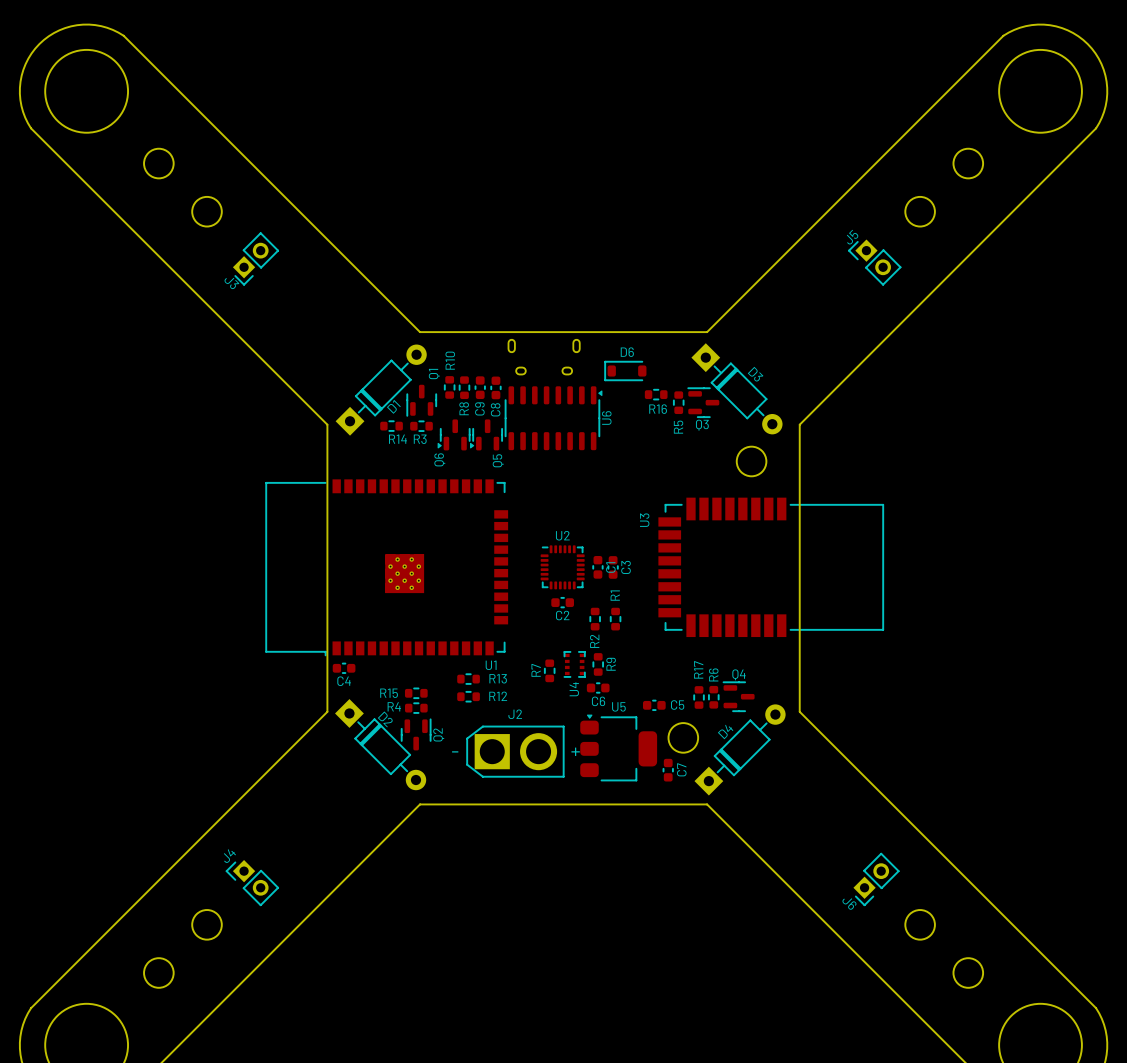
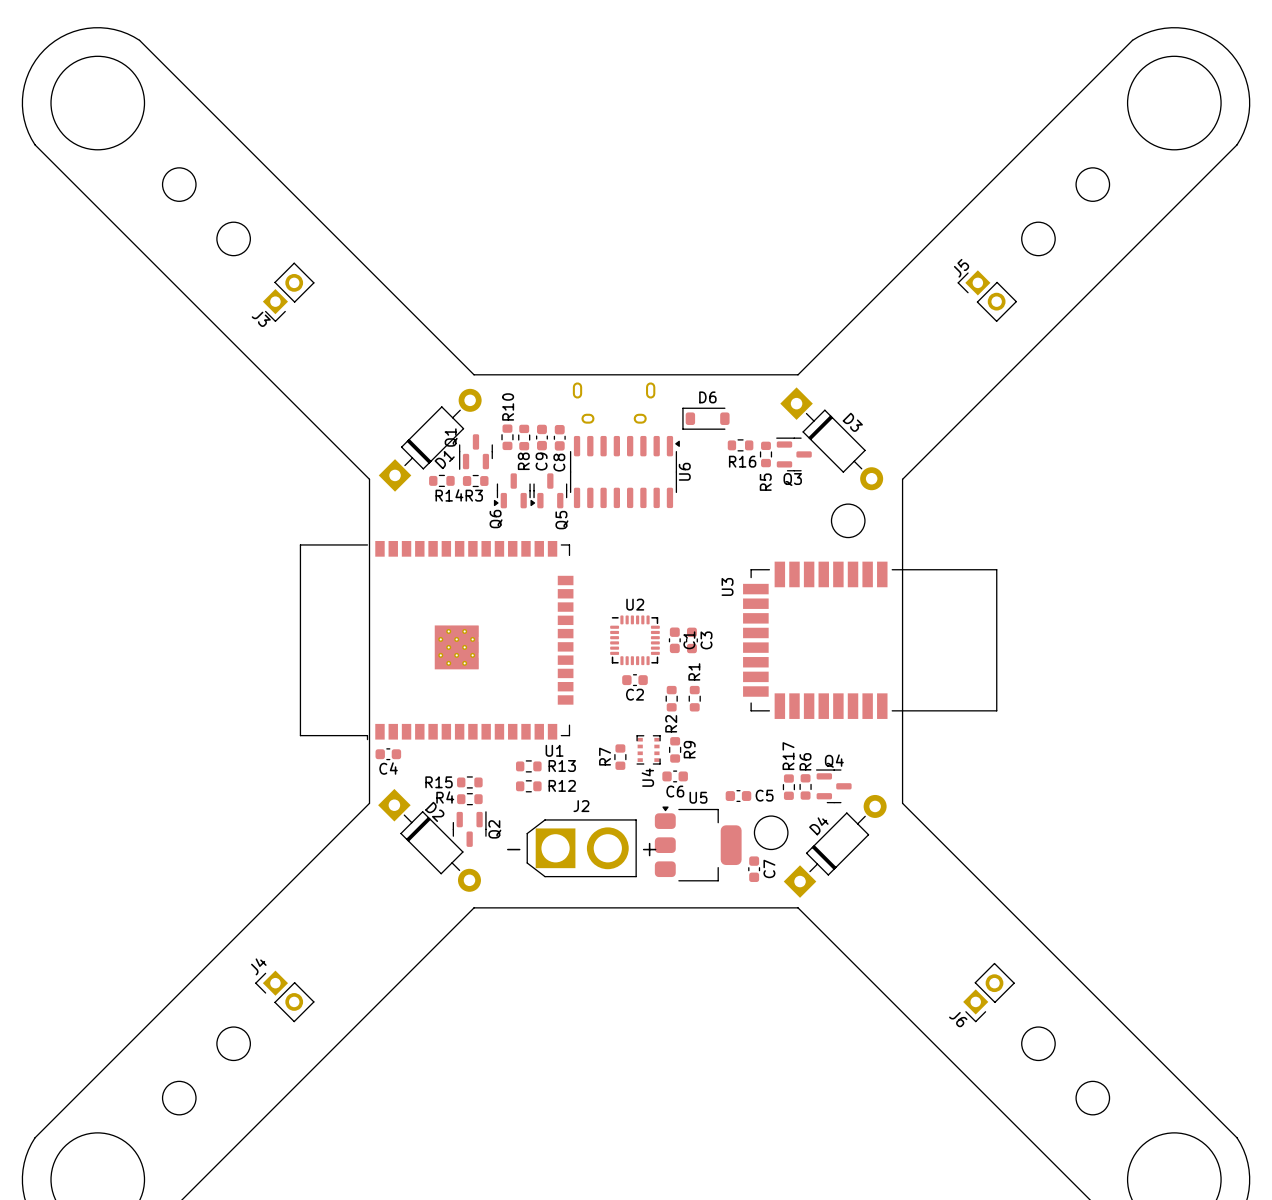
Q1 name position: Q1 (434, 374) -> Q1 (451, 437)

